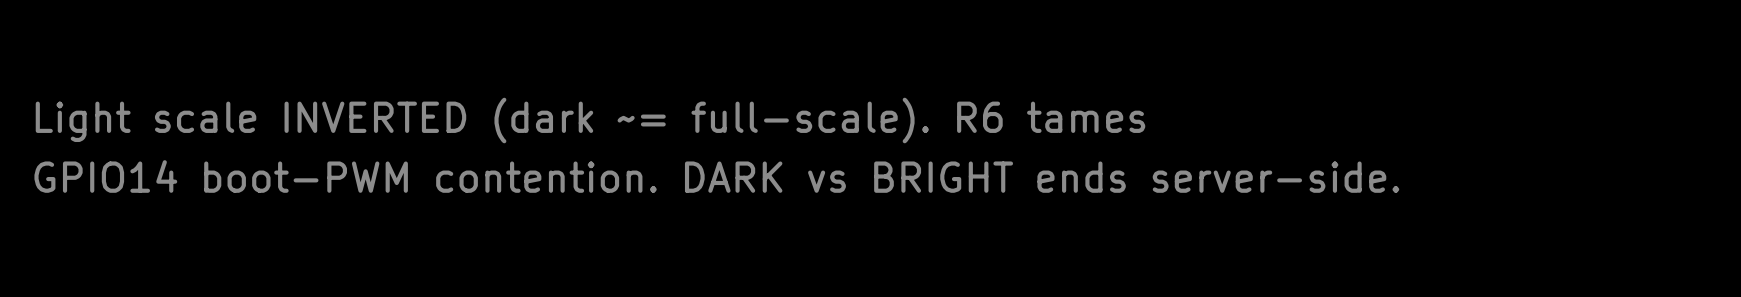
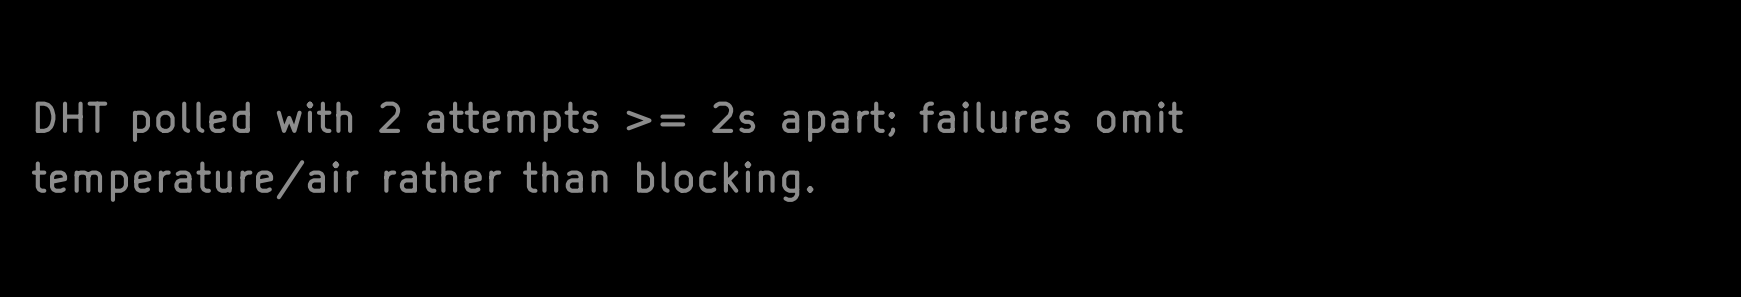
text: Light scale INVERTED (dark ~= full-scale). R6 tames (590, 120) -> DHT polled with 2 attempts >= 2s apart; failures omit (609, 121)
text: GPIO14 boot-PWM contention. DARK vs BRIGHT ends server-side. (716, 176) -> temperature/air rather than blocking. (422, 181)

